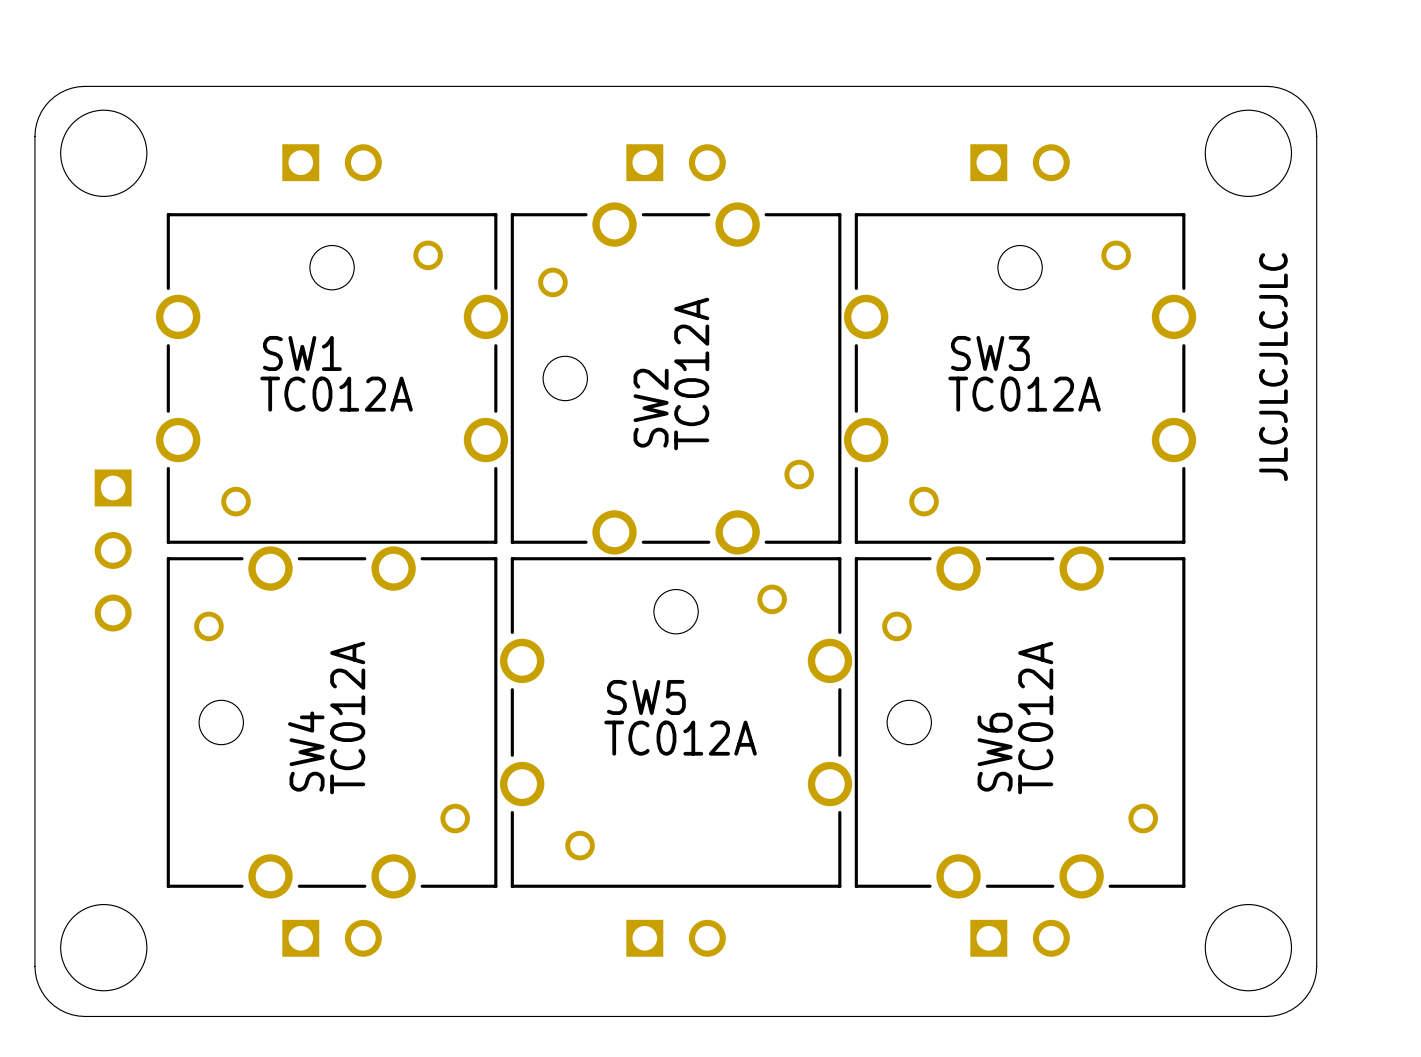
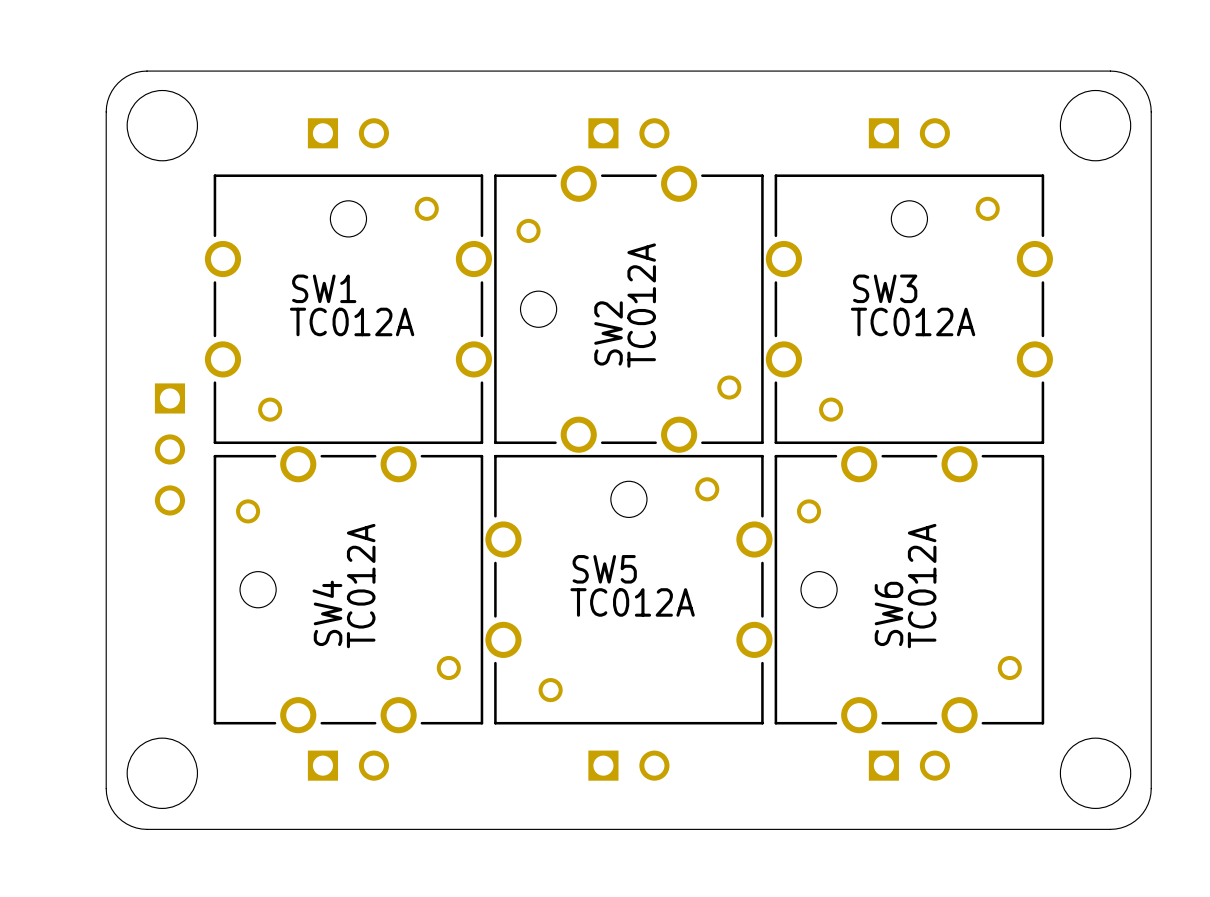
text: JLCJLCJLCJLC (1273, 367) -> none

